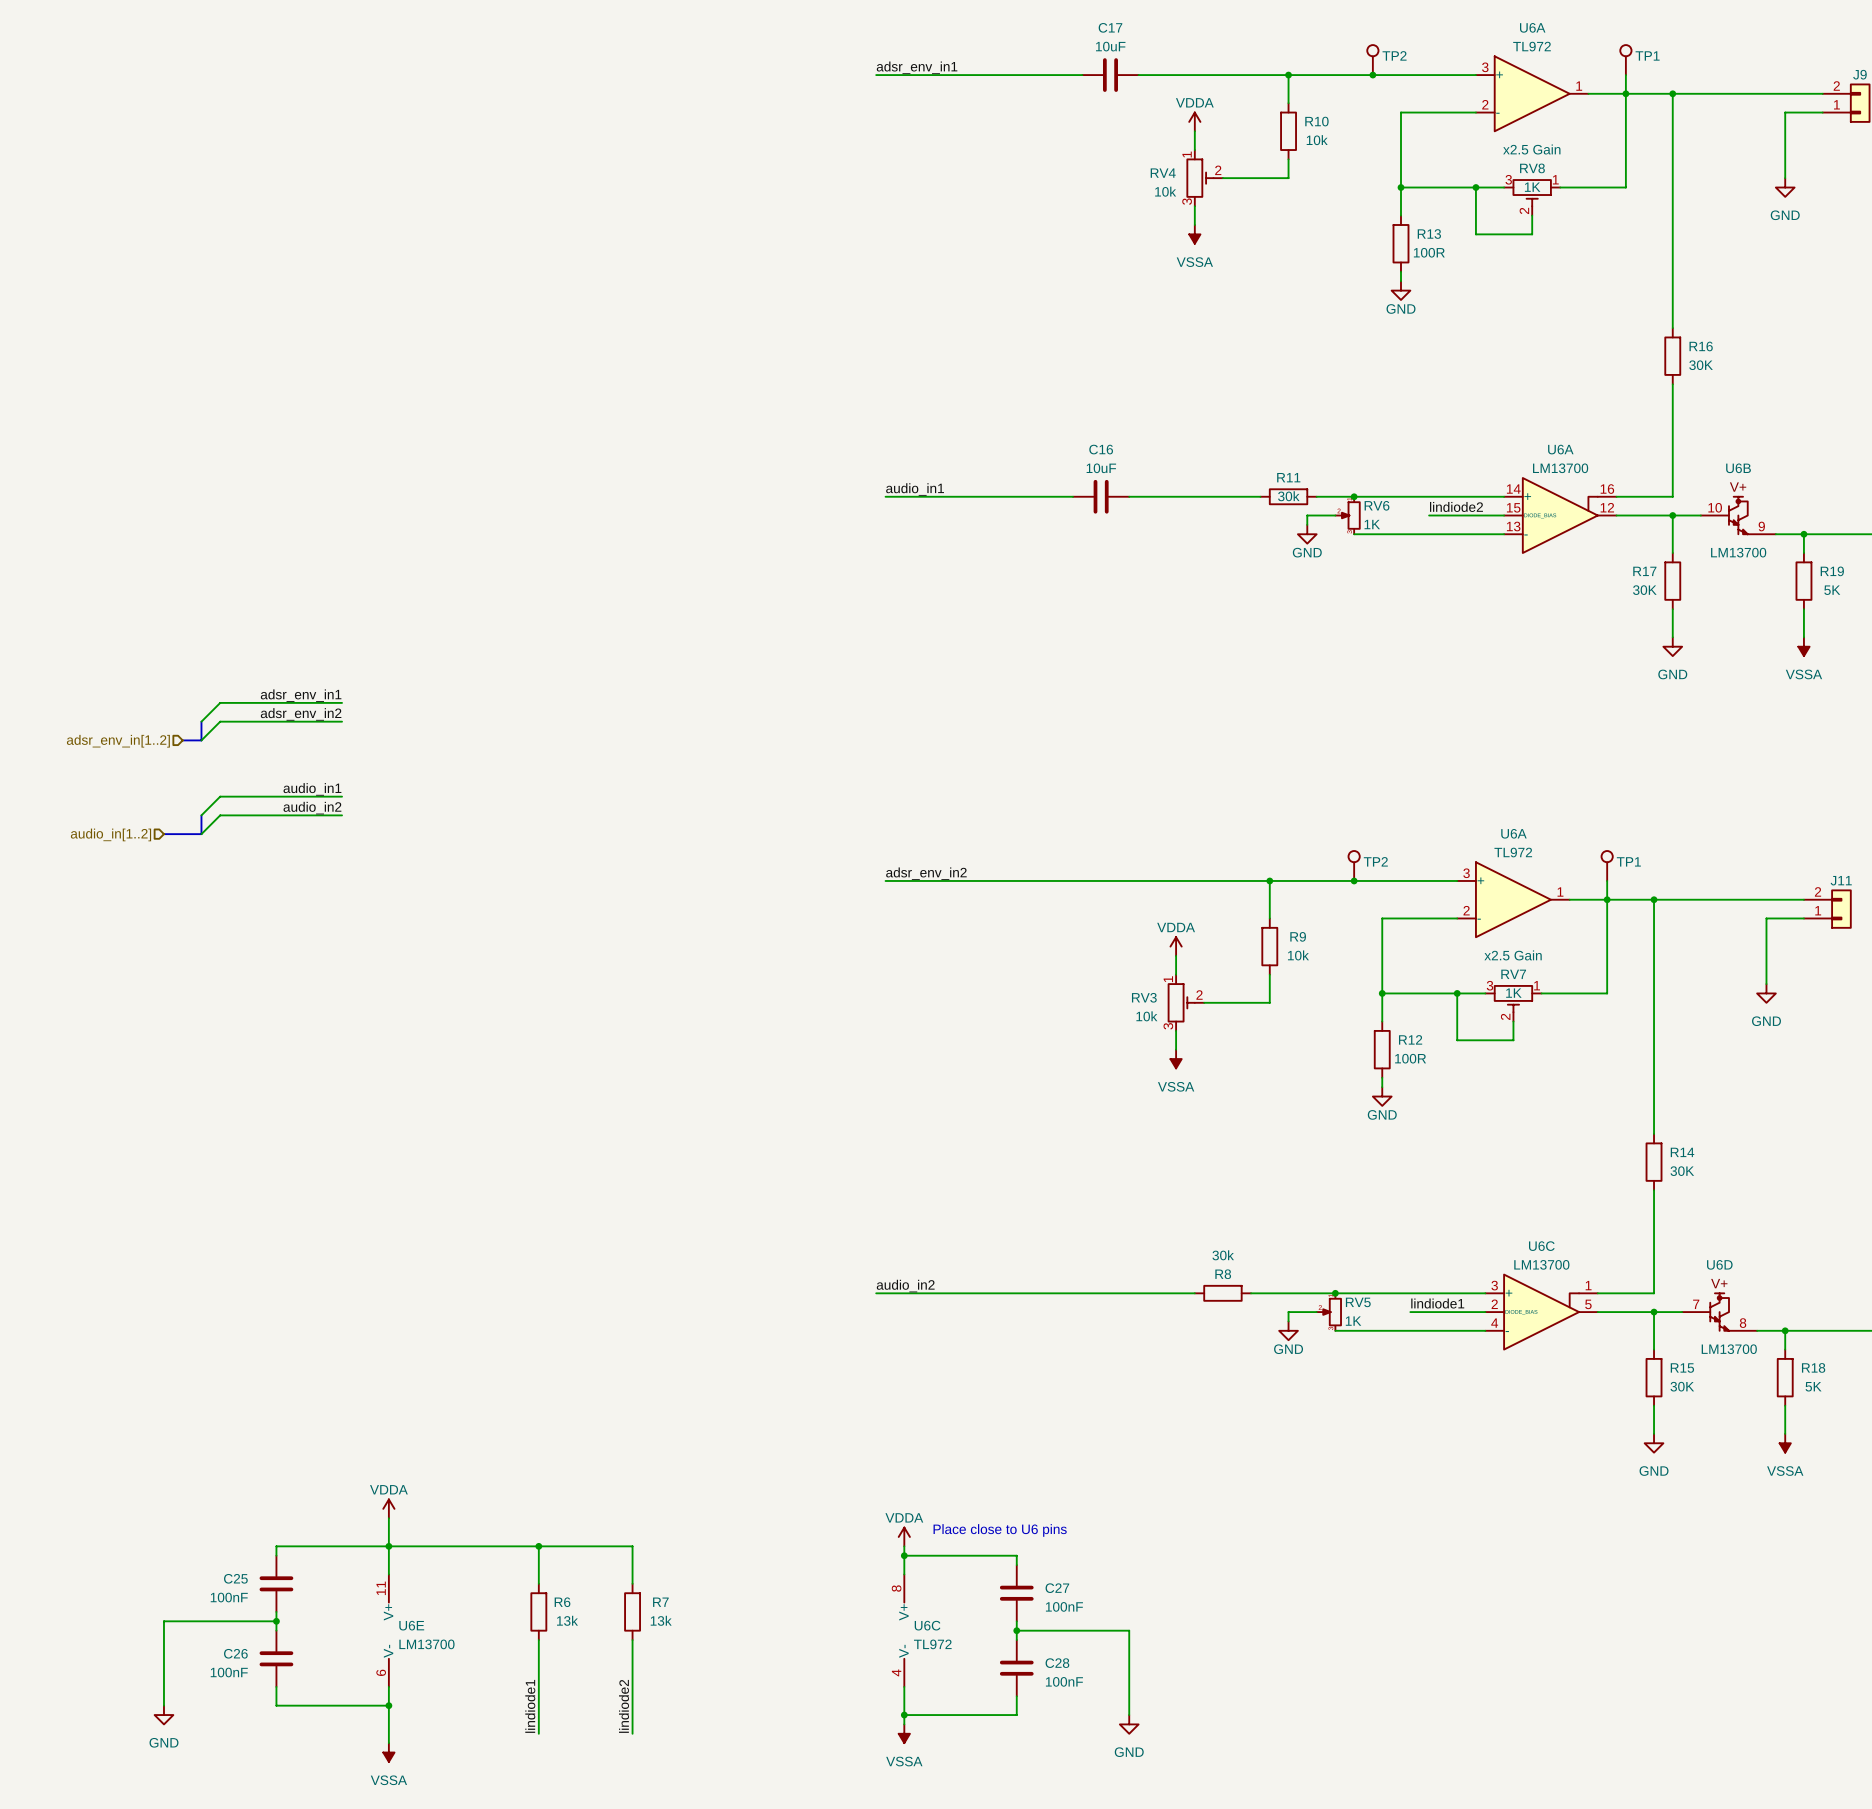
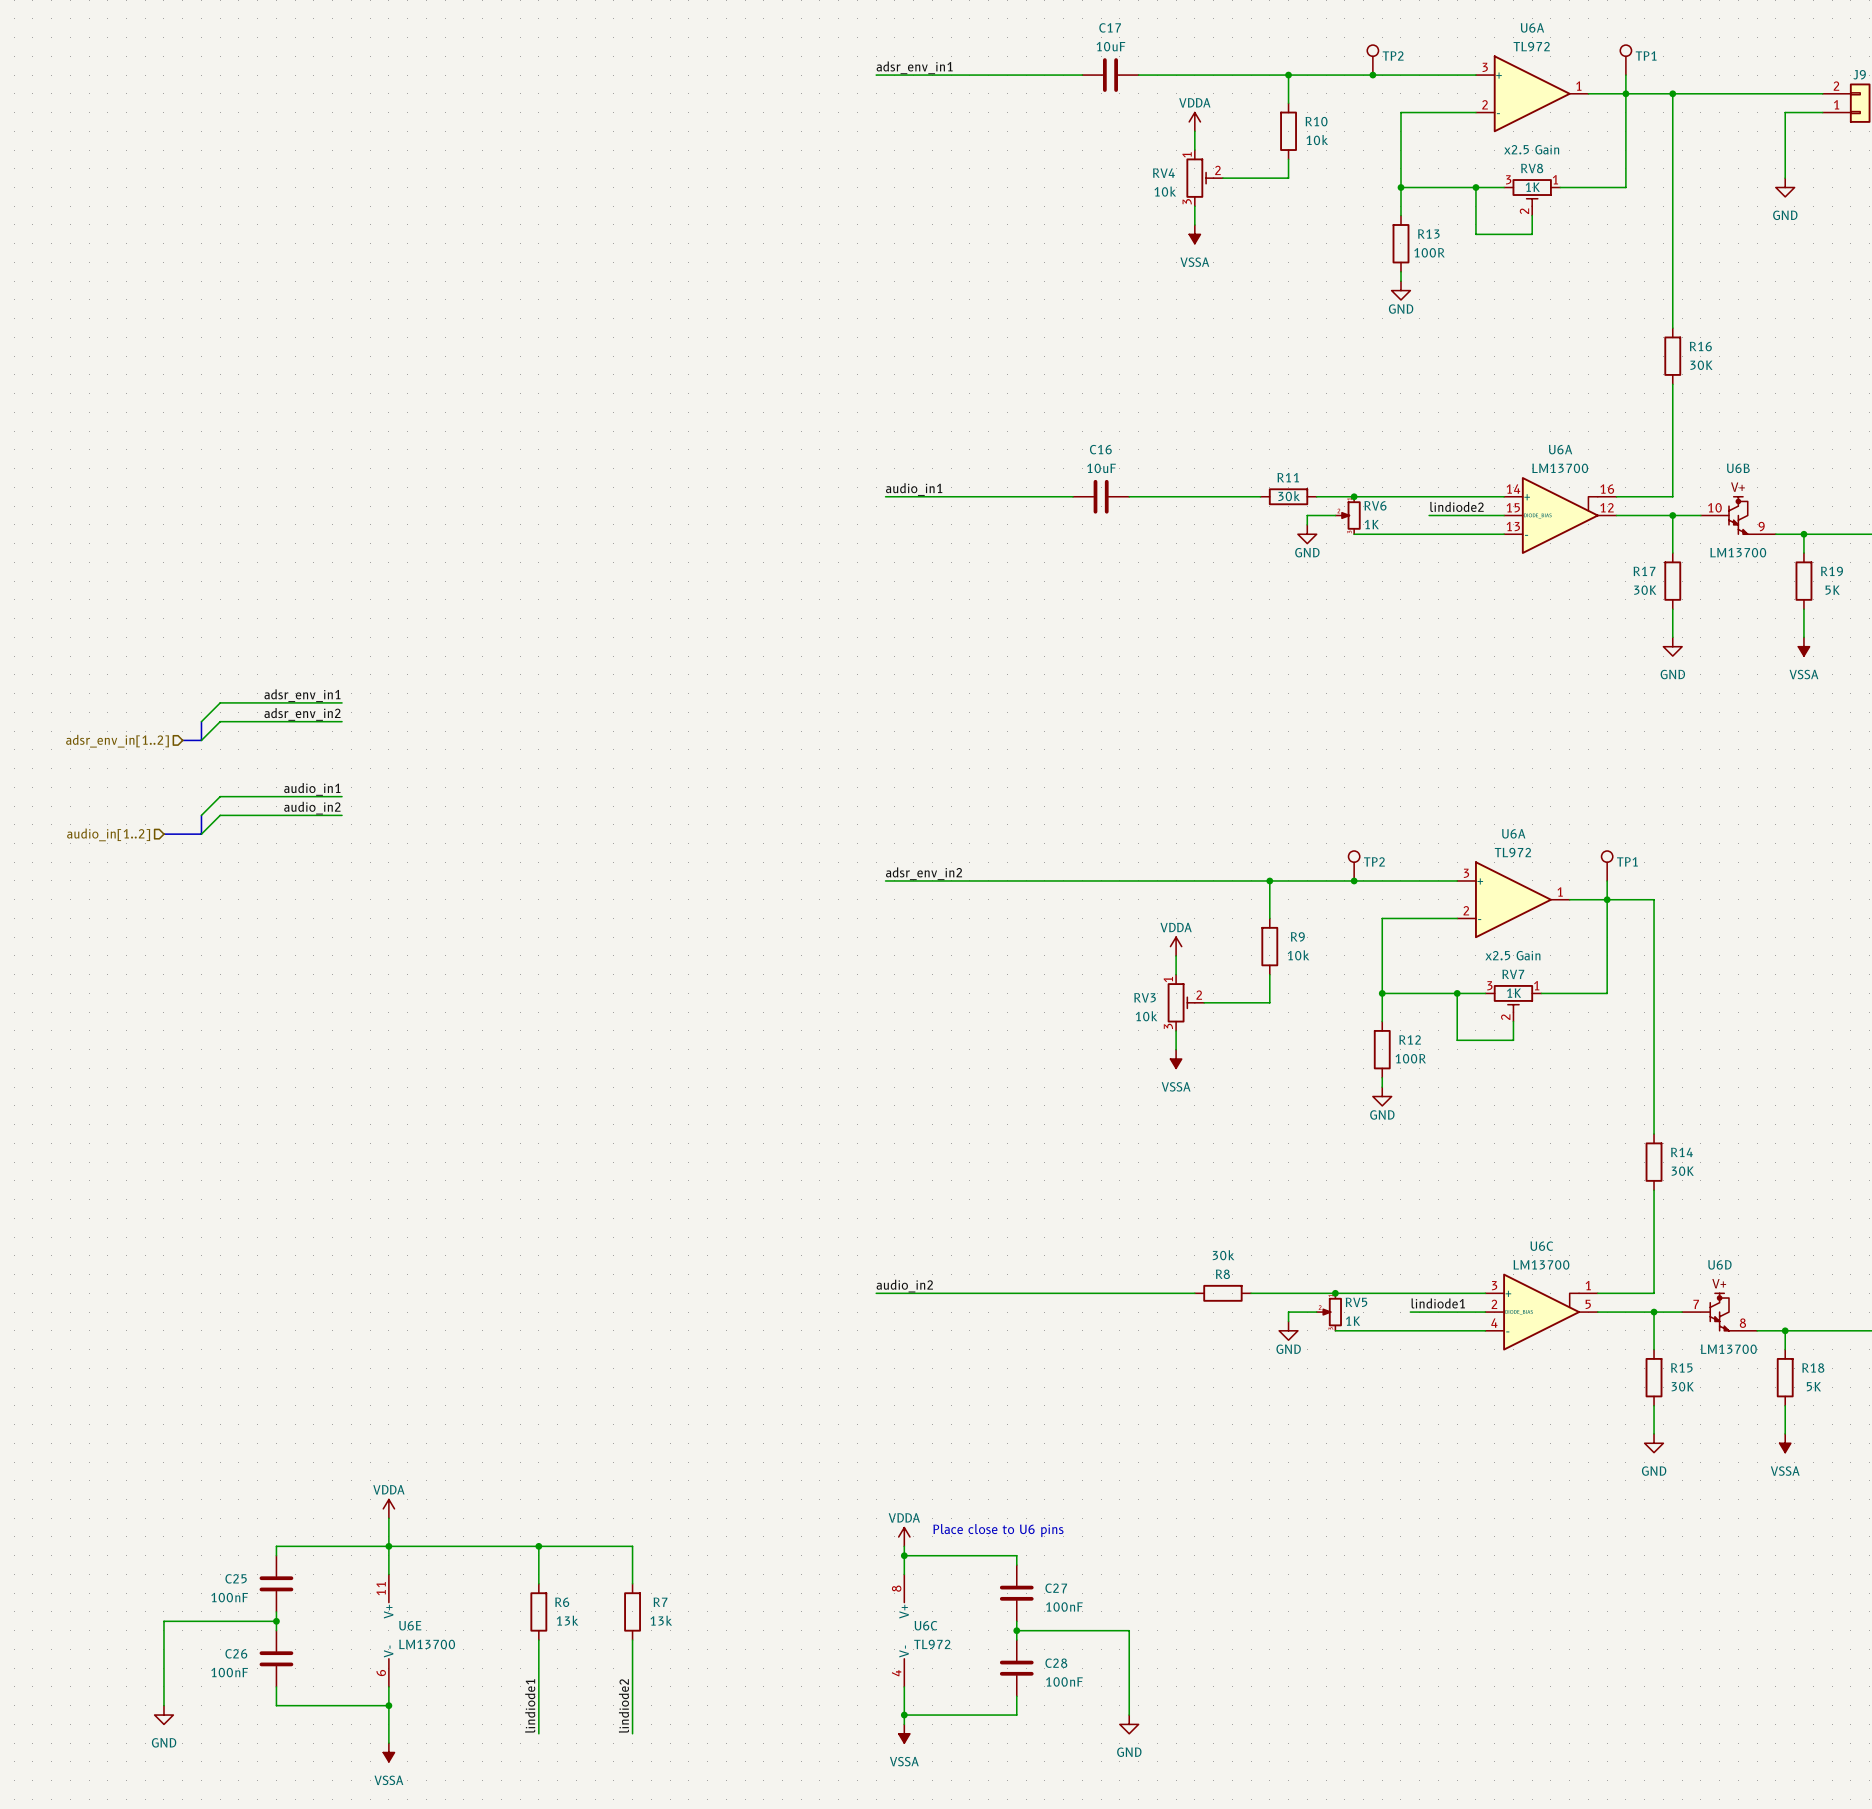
wire: (1654, 899) (1803, 899) -> none
junction: (1654, 899) -> none
J11: (1827, 909) -> none
wire: (1803, 918) (1766, 918) (1766, 984) -> none
power symbol: GND (1766, 993) -> none

